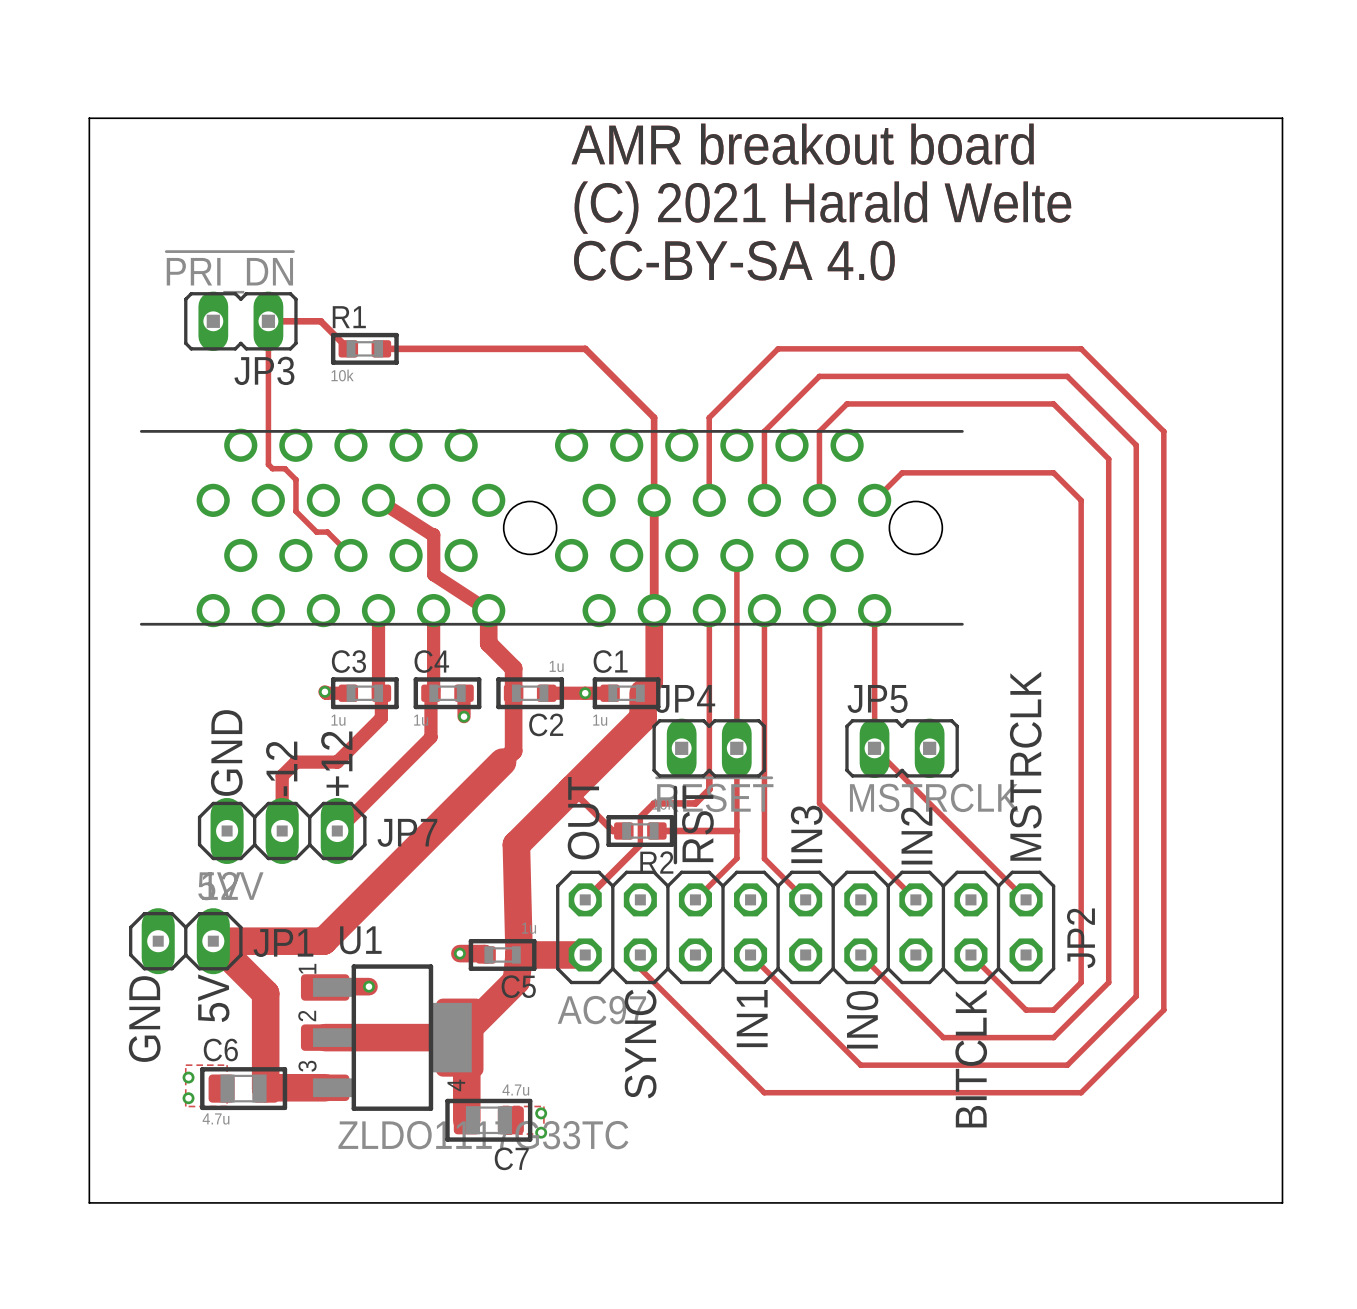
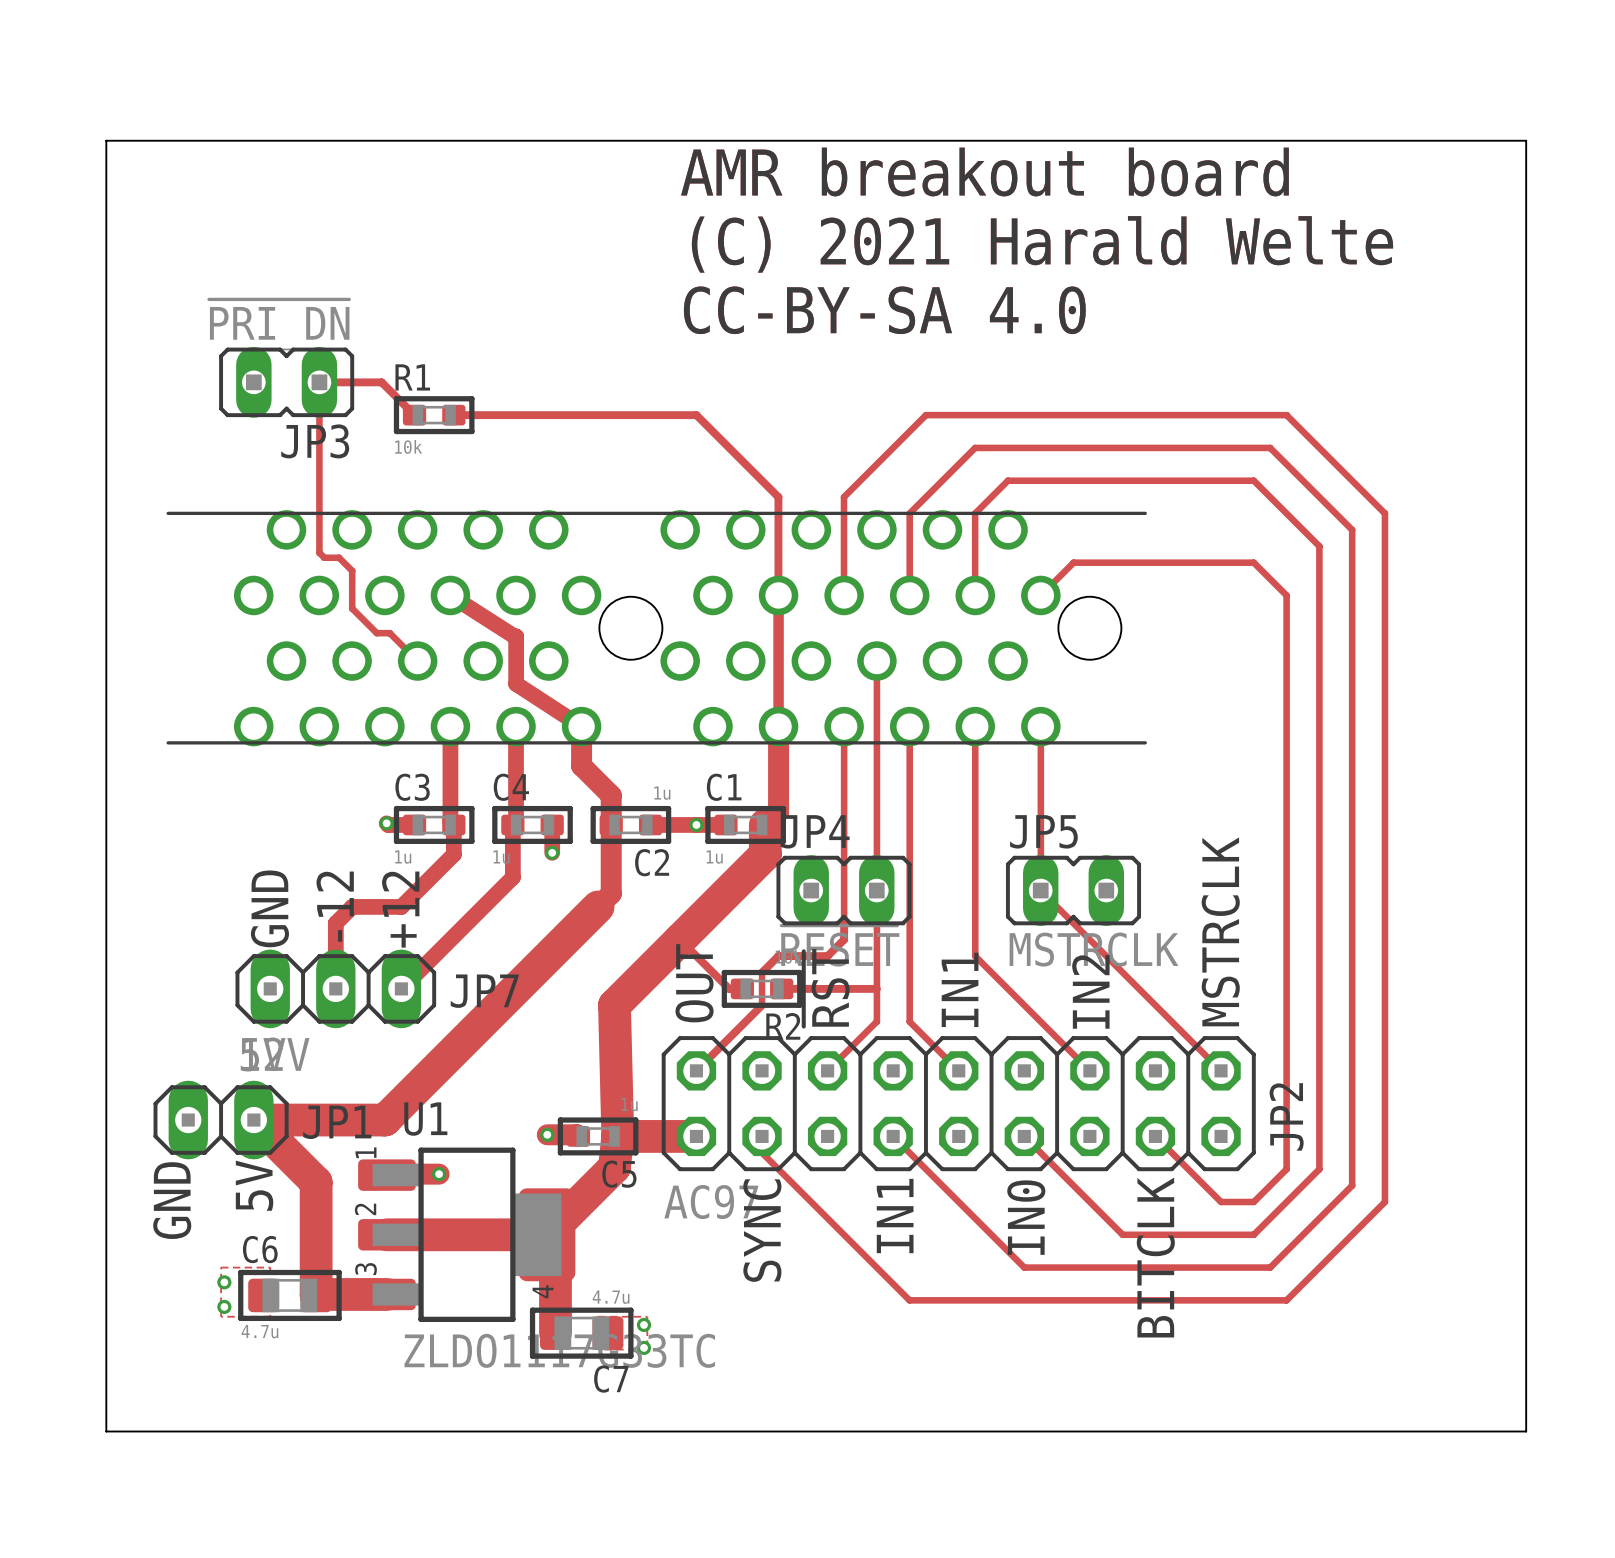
text: IN3 (806, 834) -> IN1 (960, 989)

